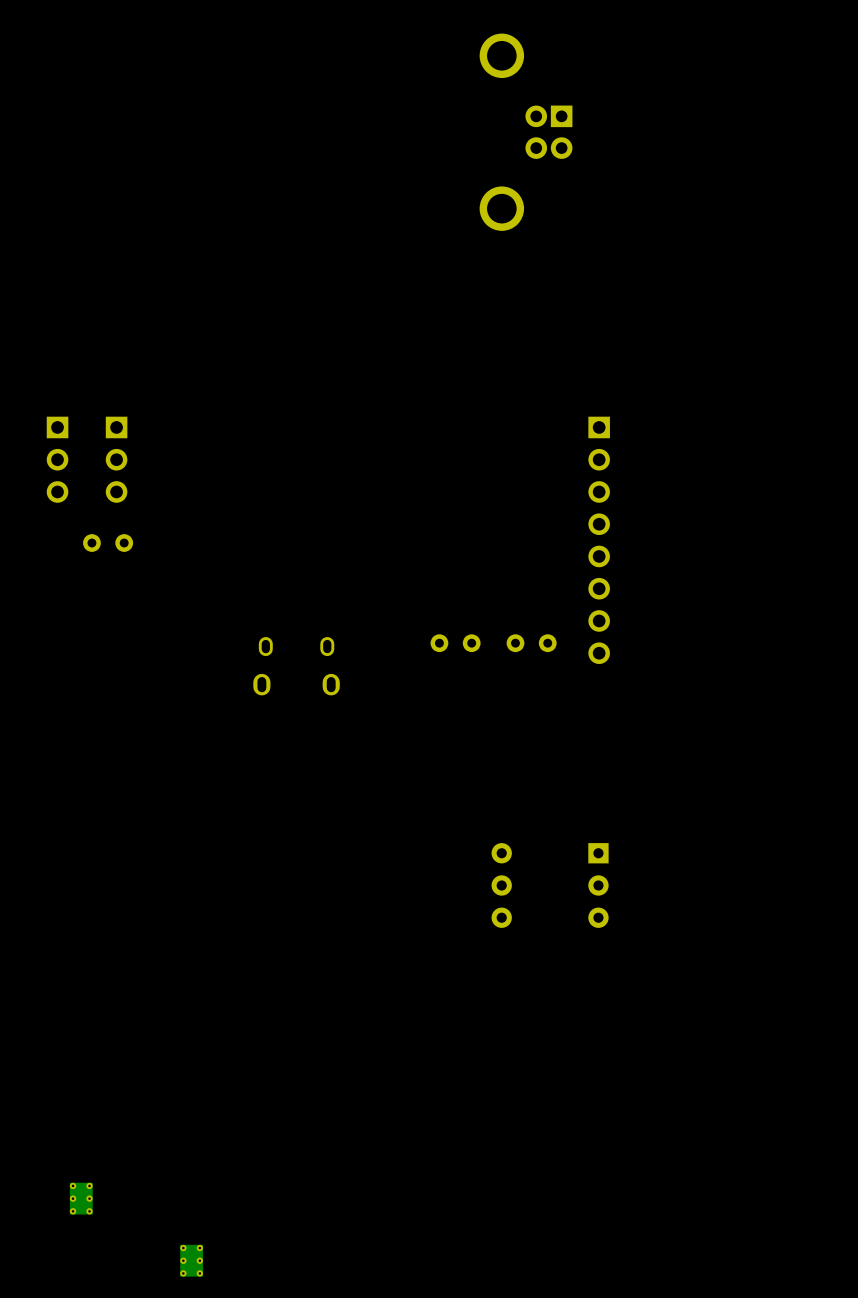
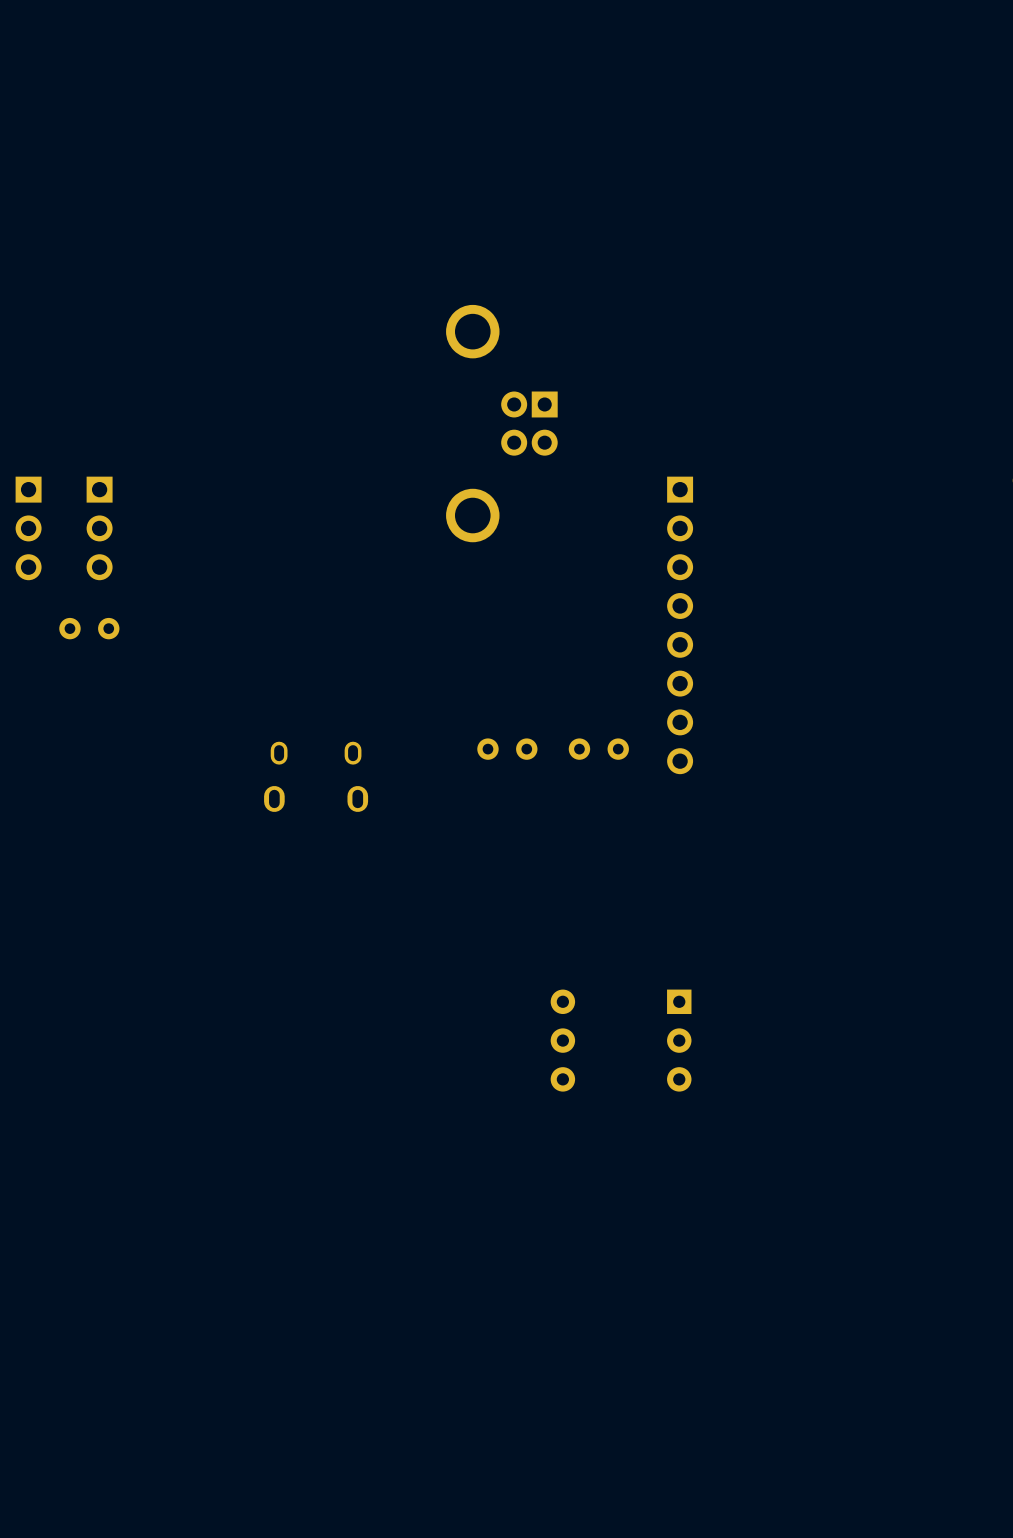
part position: (526, 132) -> (501, 423)
part: (81, 1198) -> none
part: (191, 1260) -> none

